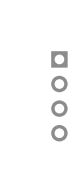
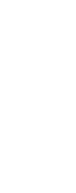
part: (59, 96) -> none

